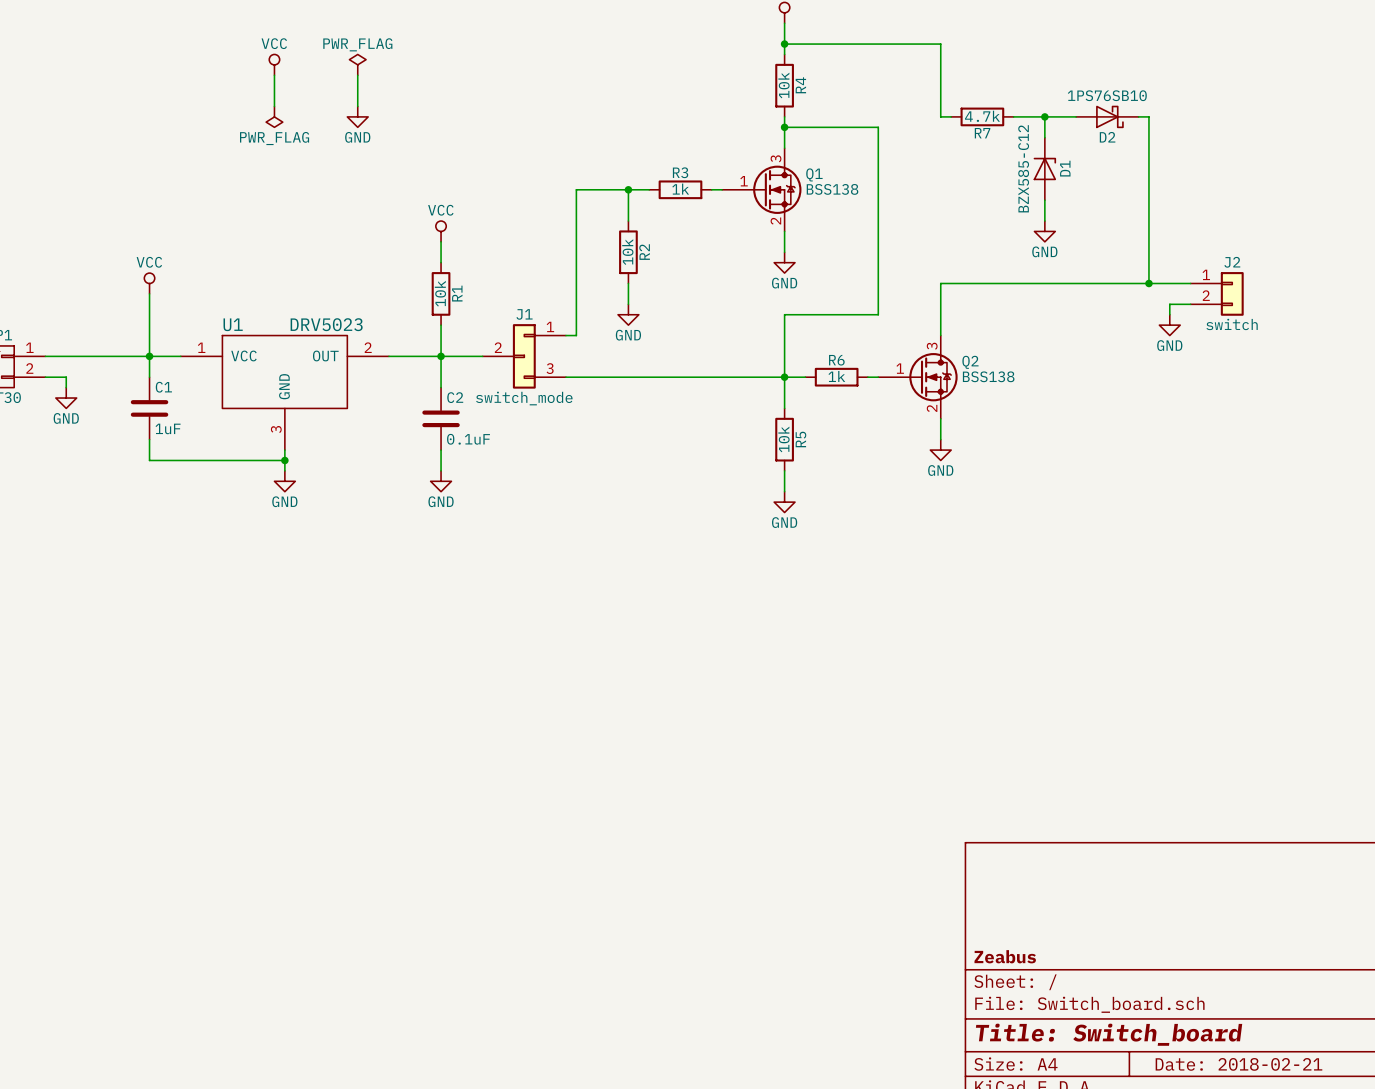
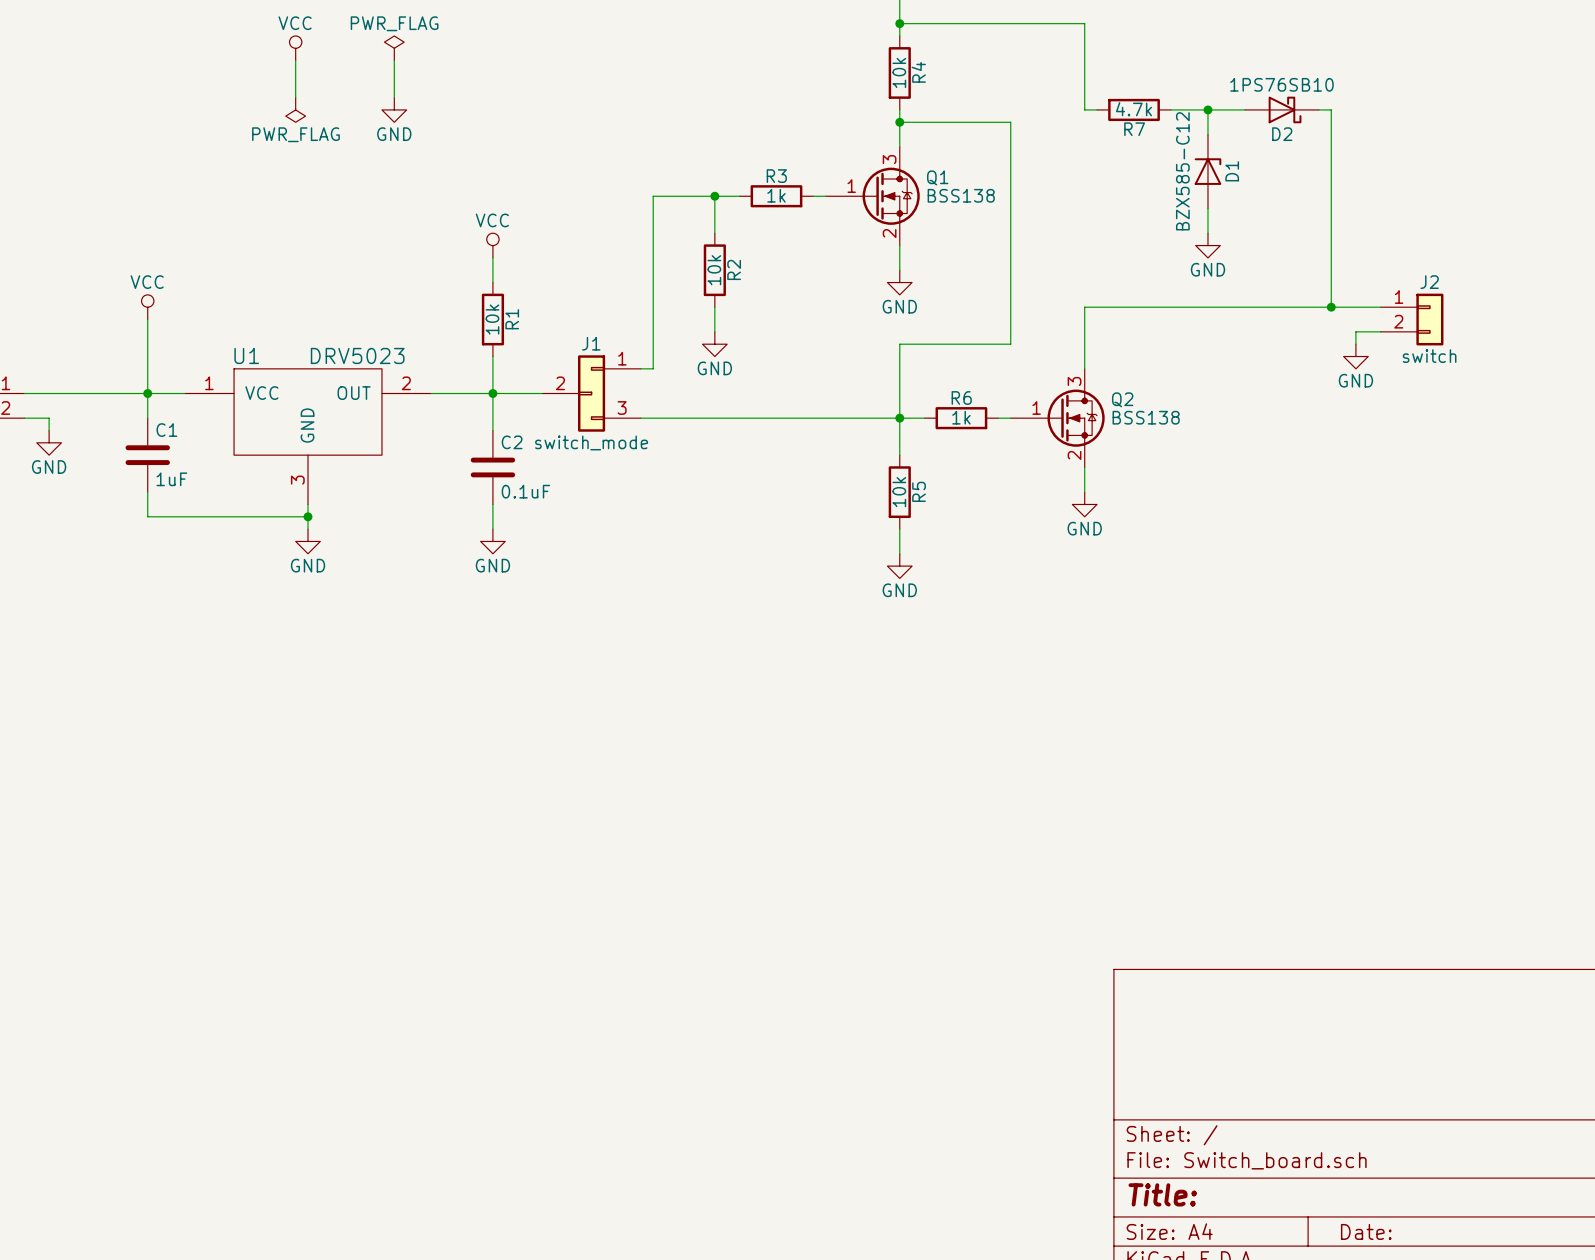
title block: Zeabus (1005, 956) -> none
title block: Title: Switch_board (1109, 1034) -> Title: (1162, 1194)
title block: Date: 2018-02-21 (1238, 1064) -> Date: (1366, 1231)

